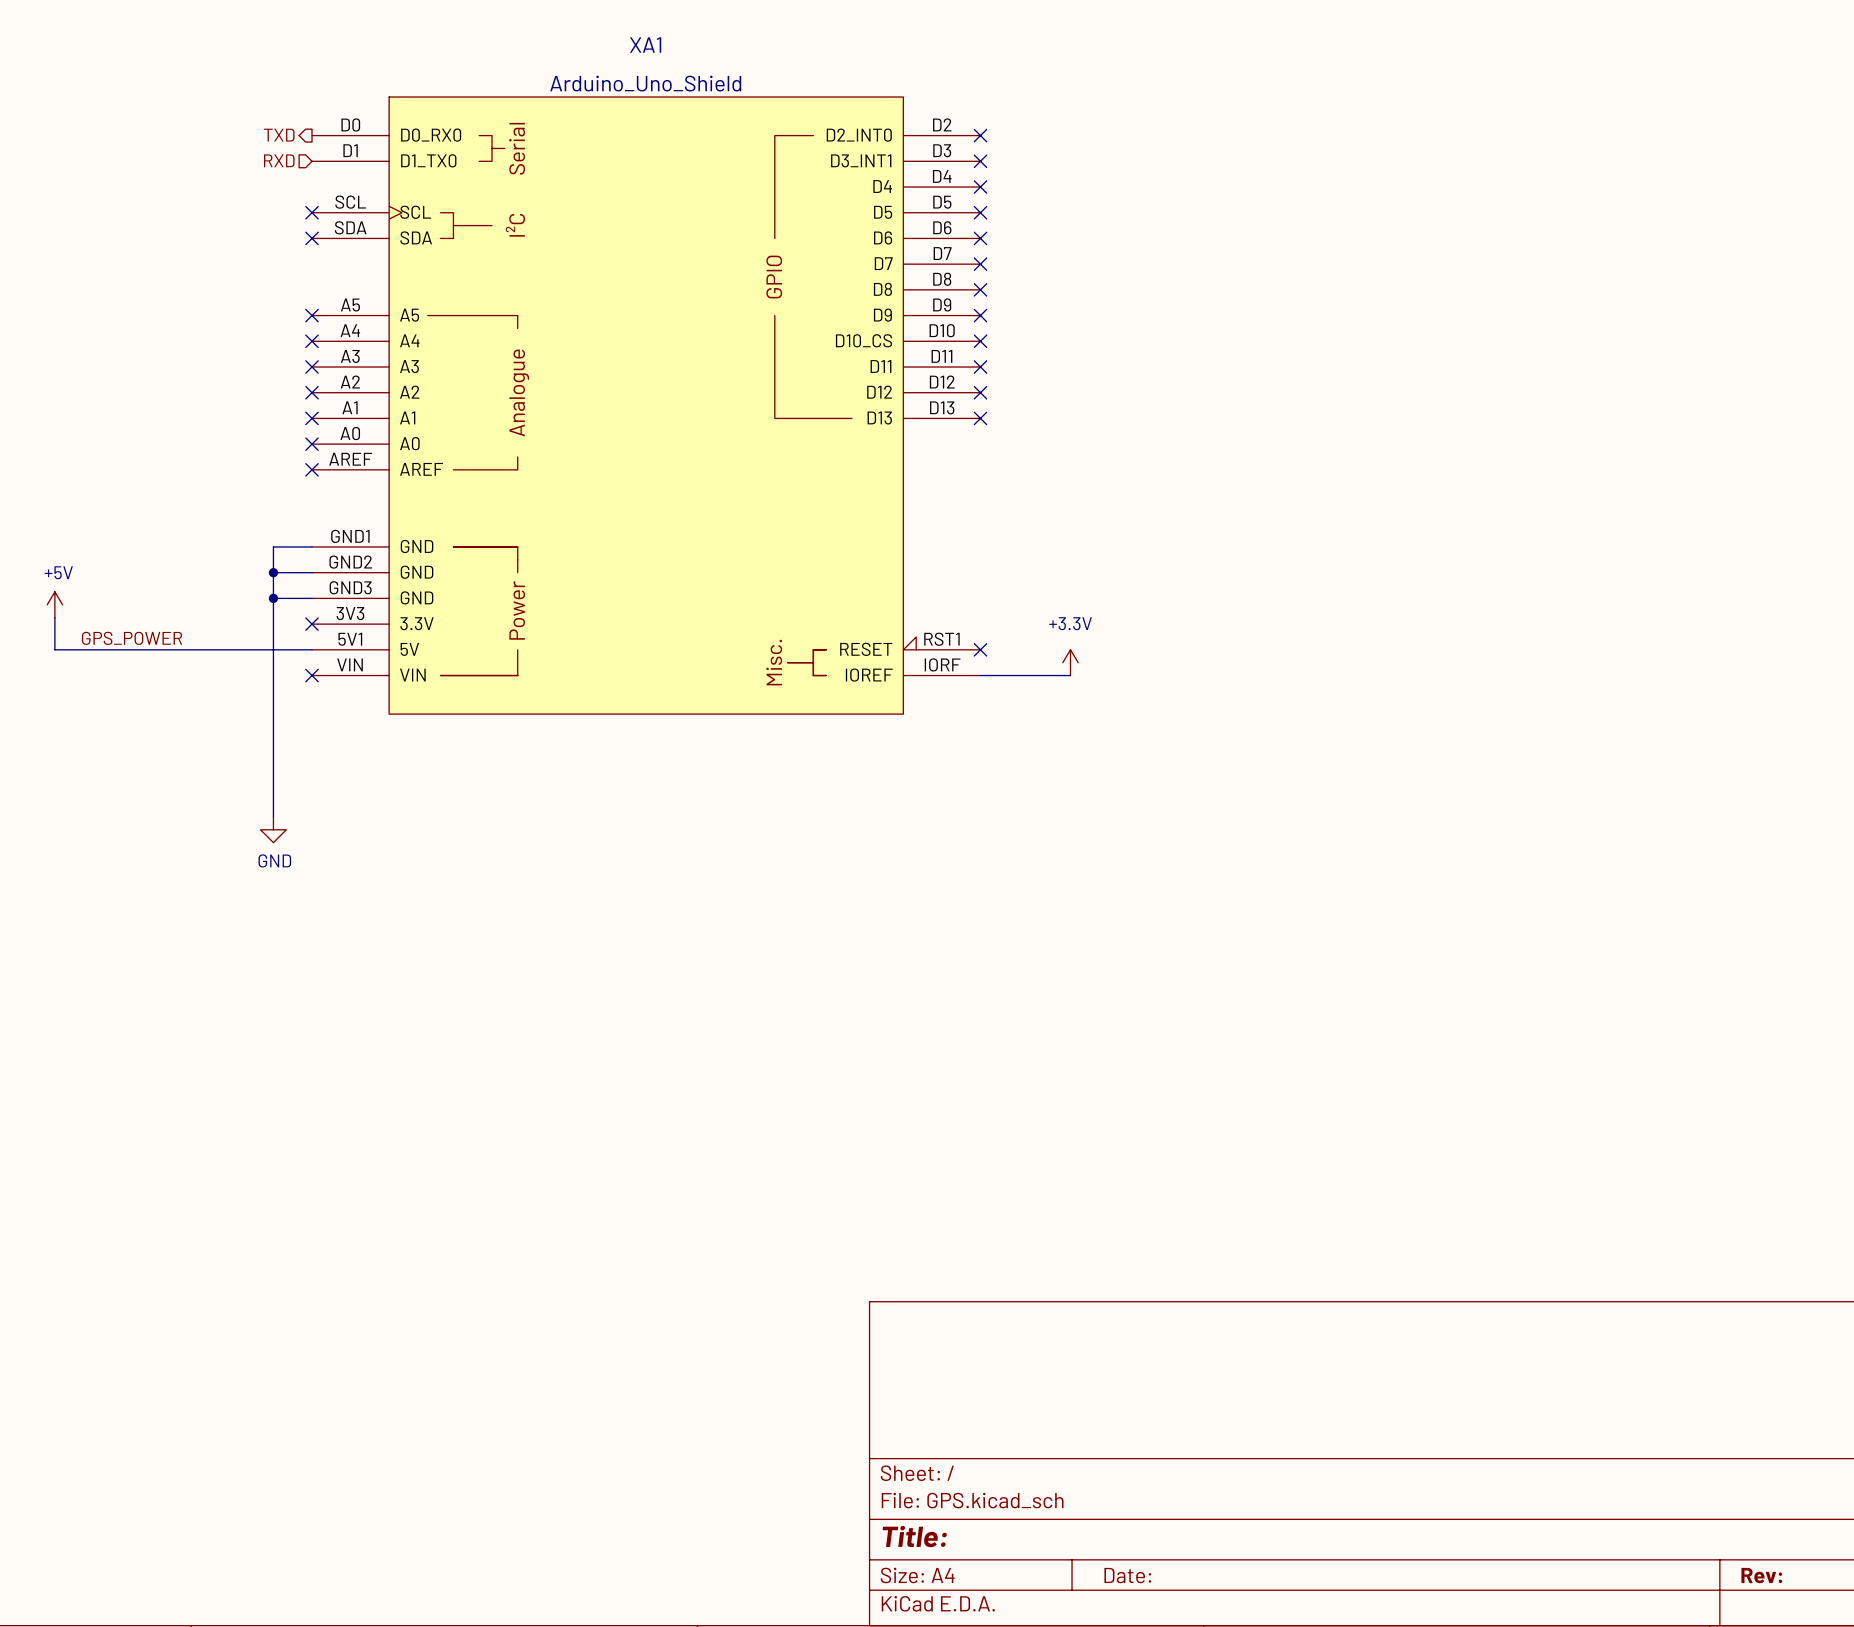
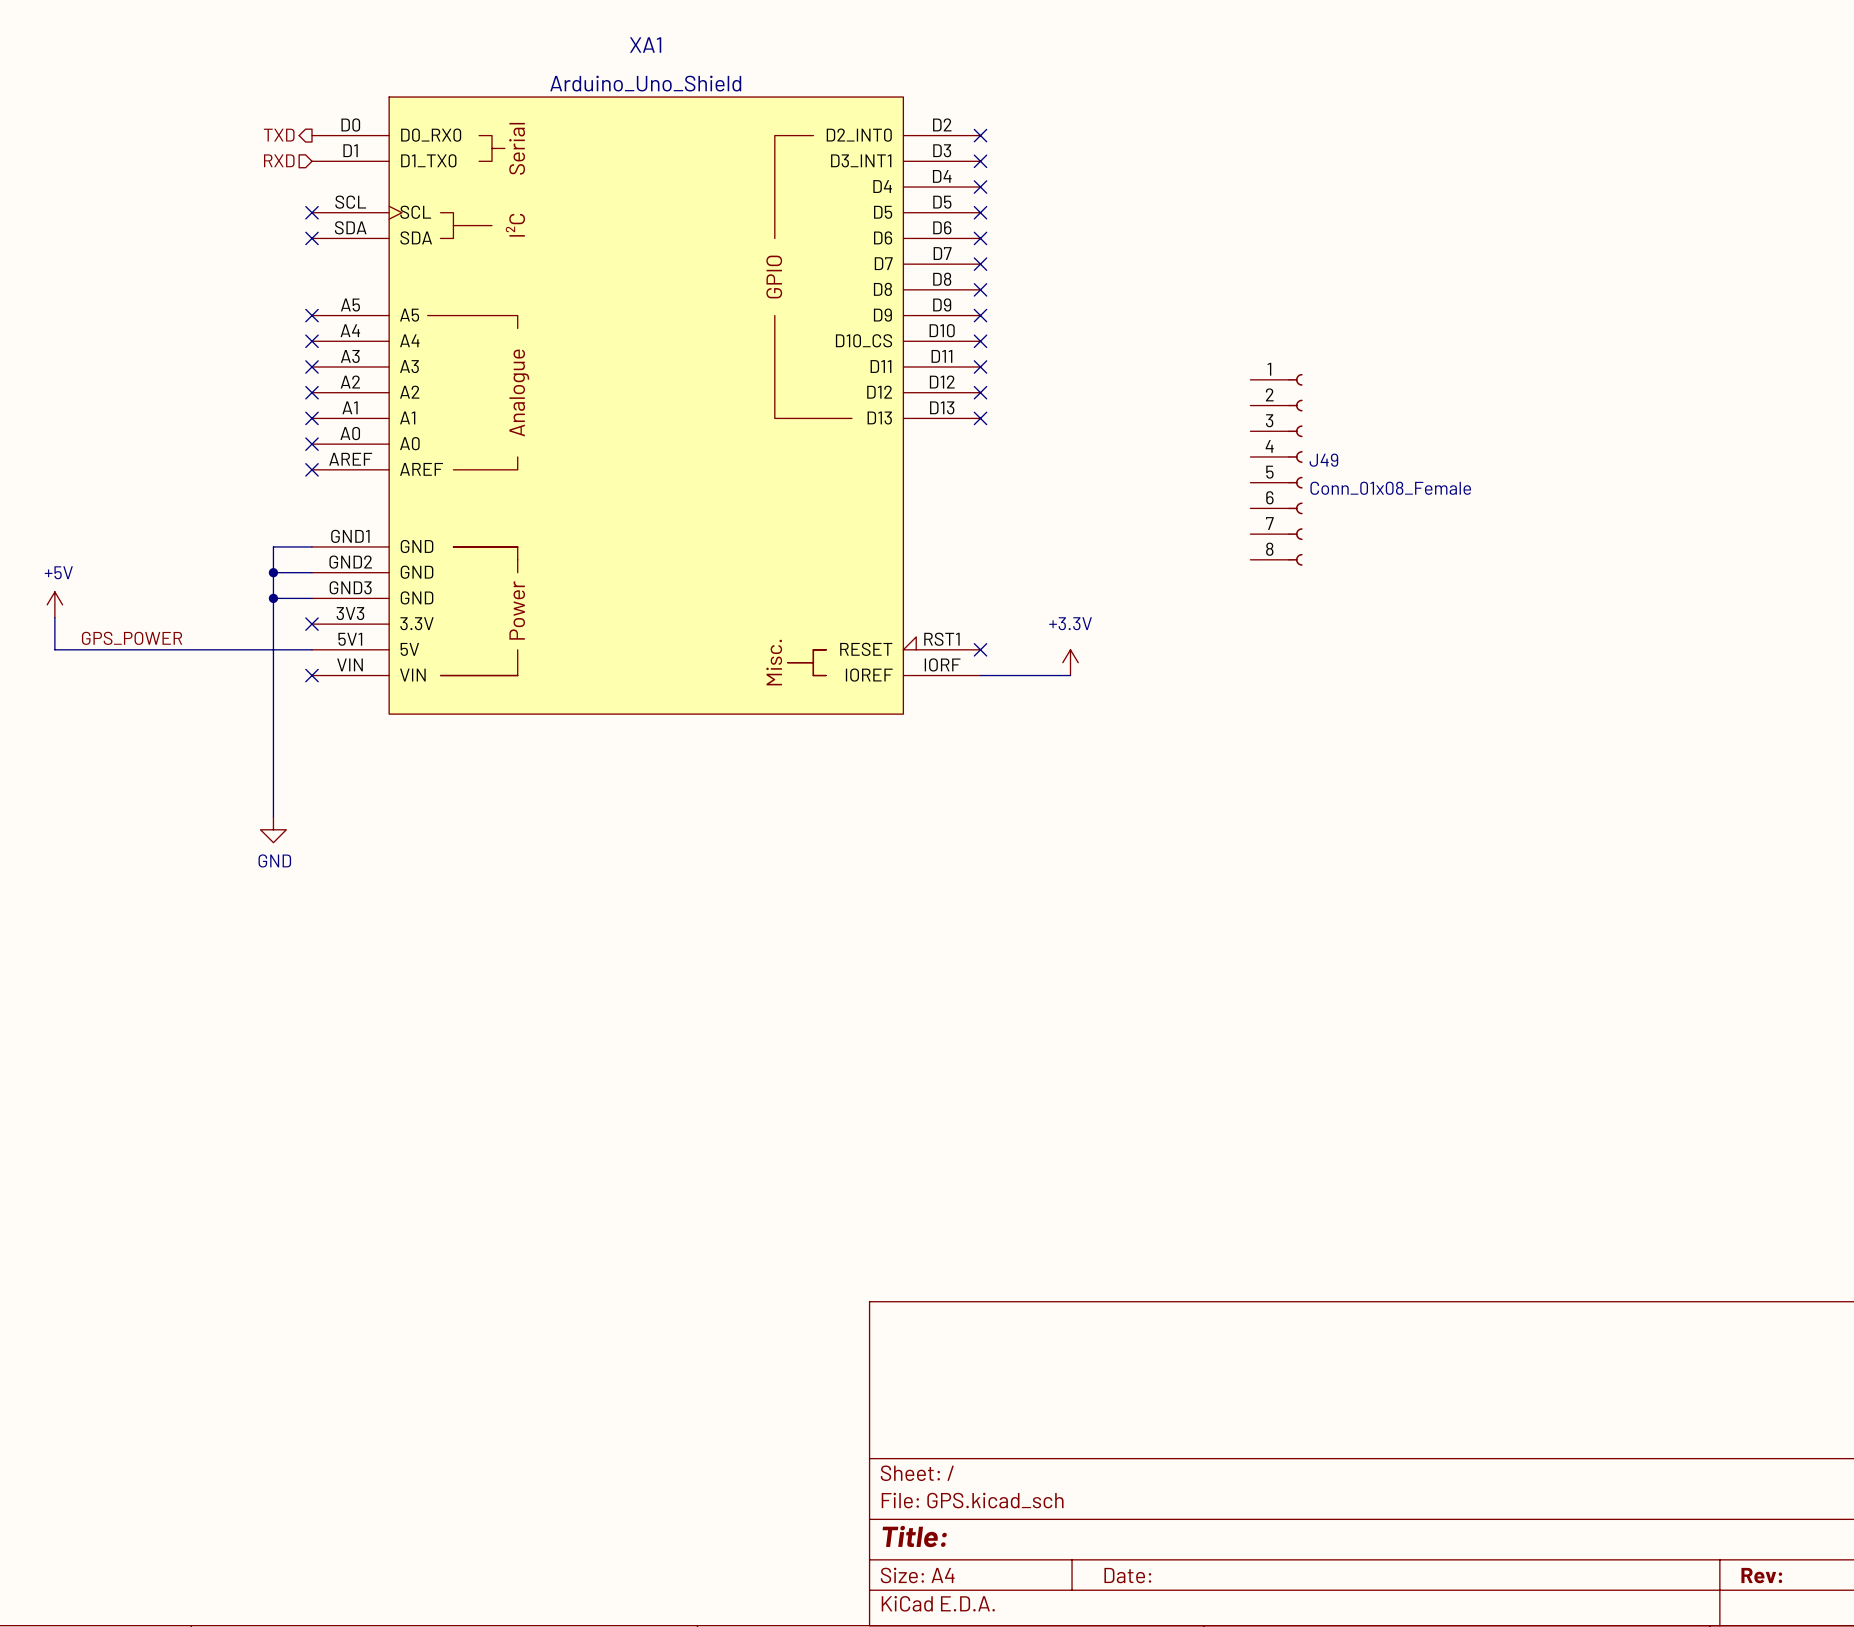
J49: none -> Conn_01x08_Female (1276, 469)

